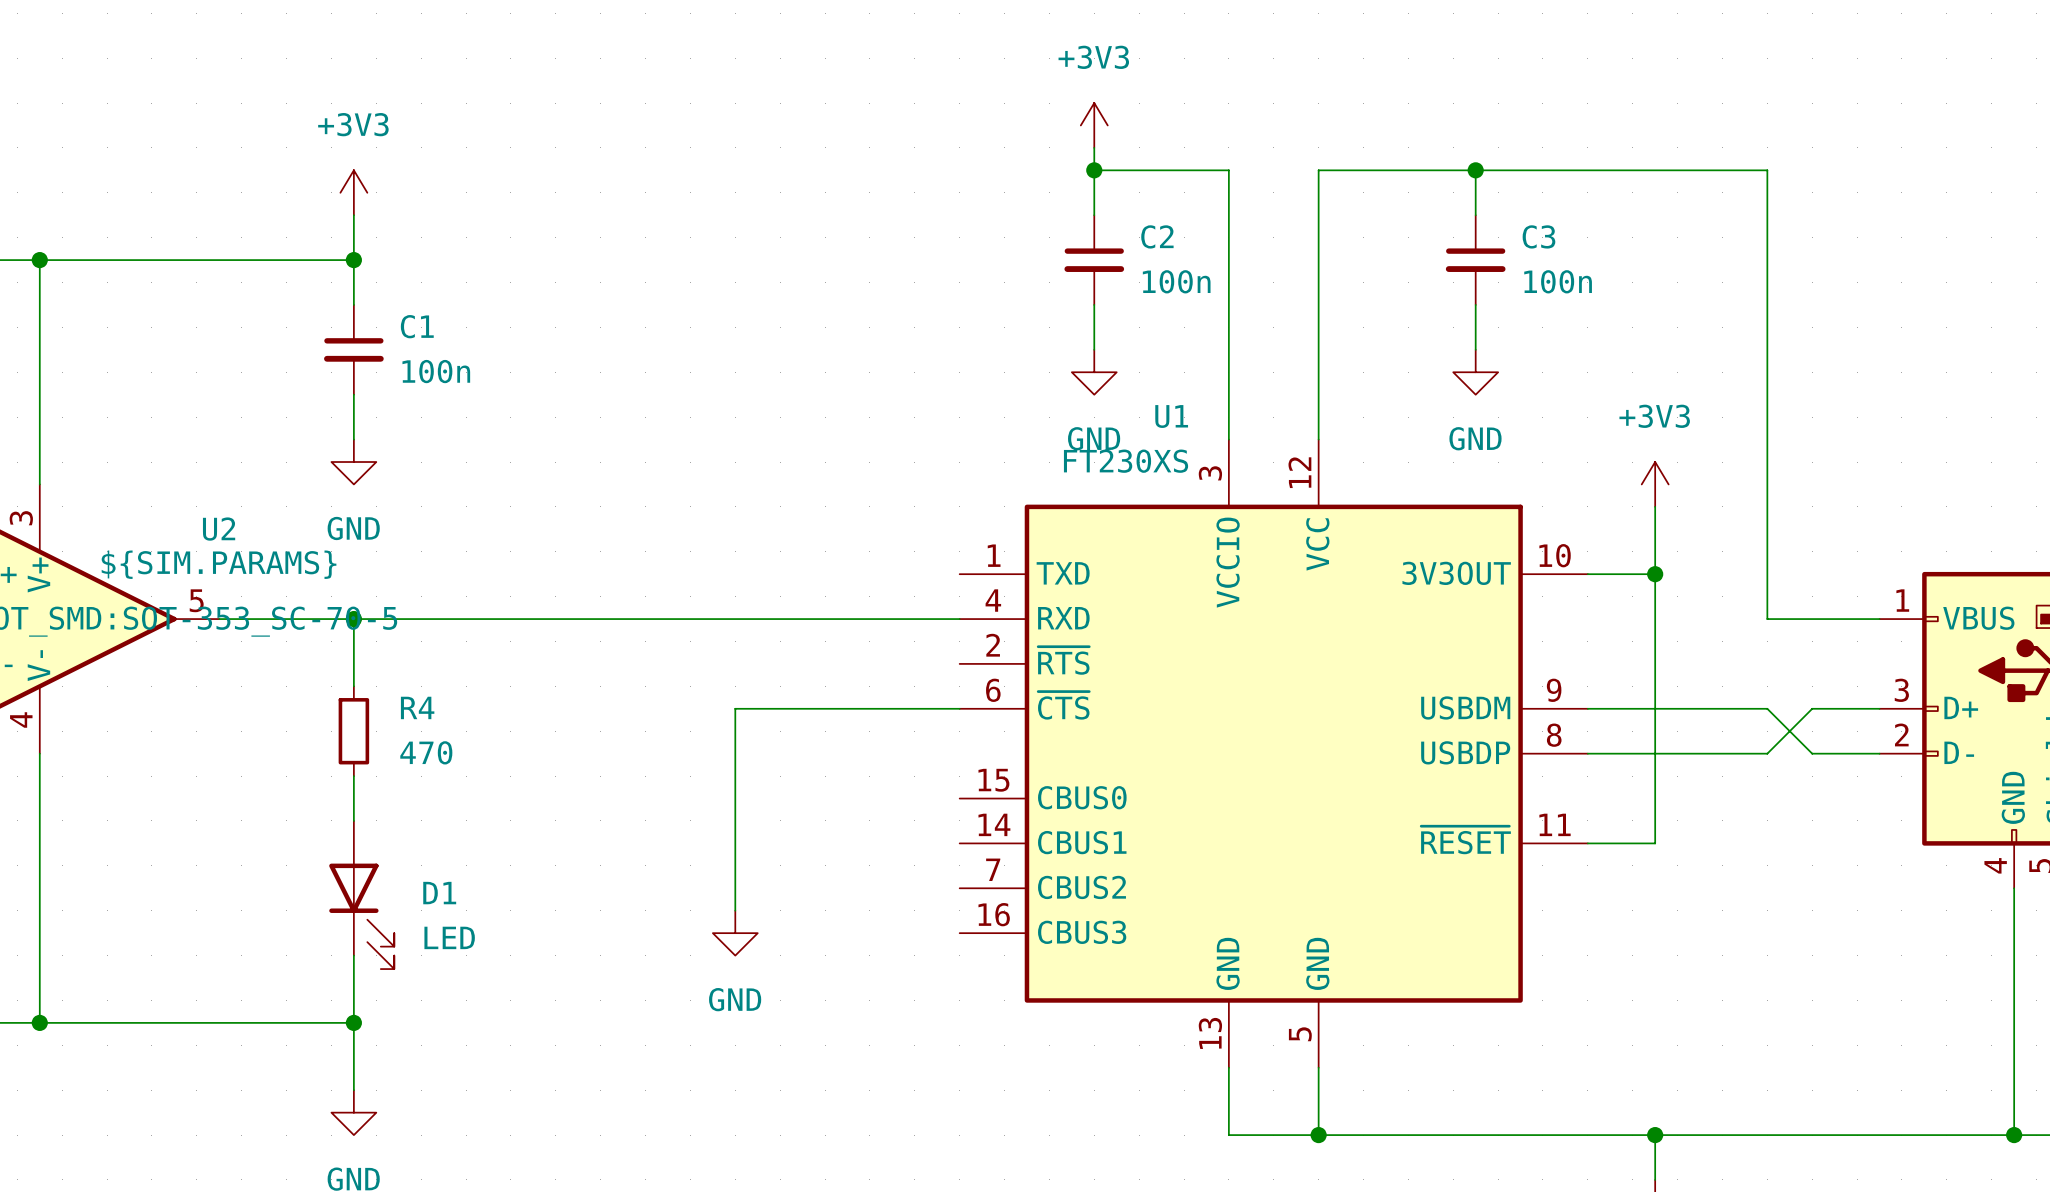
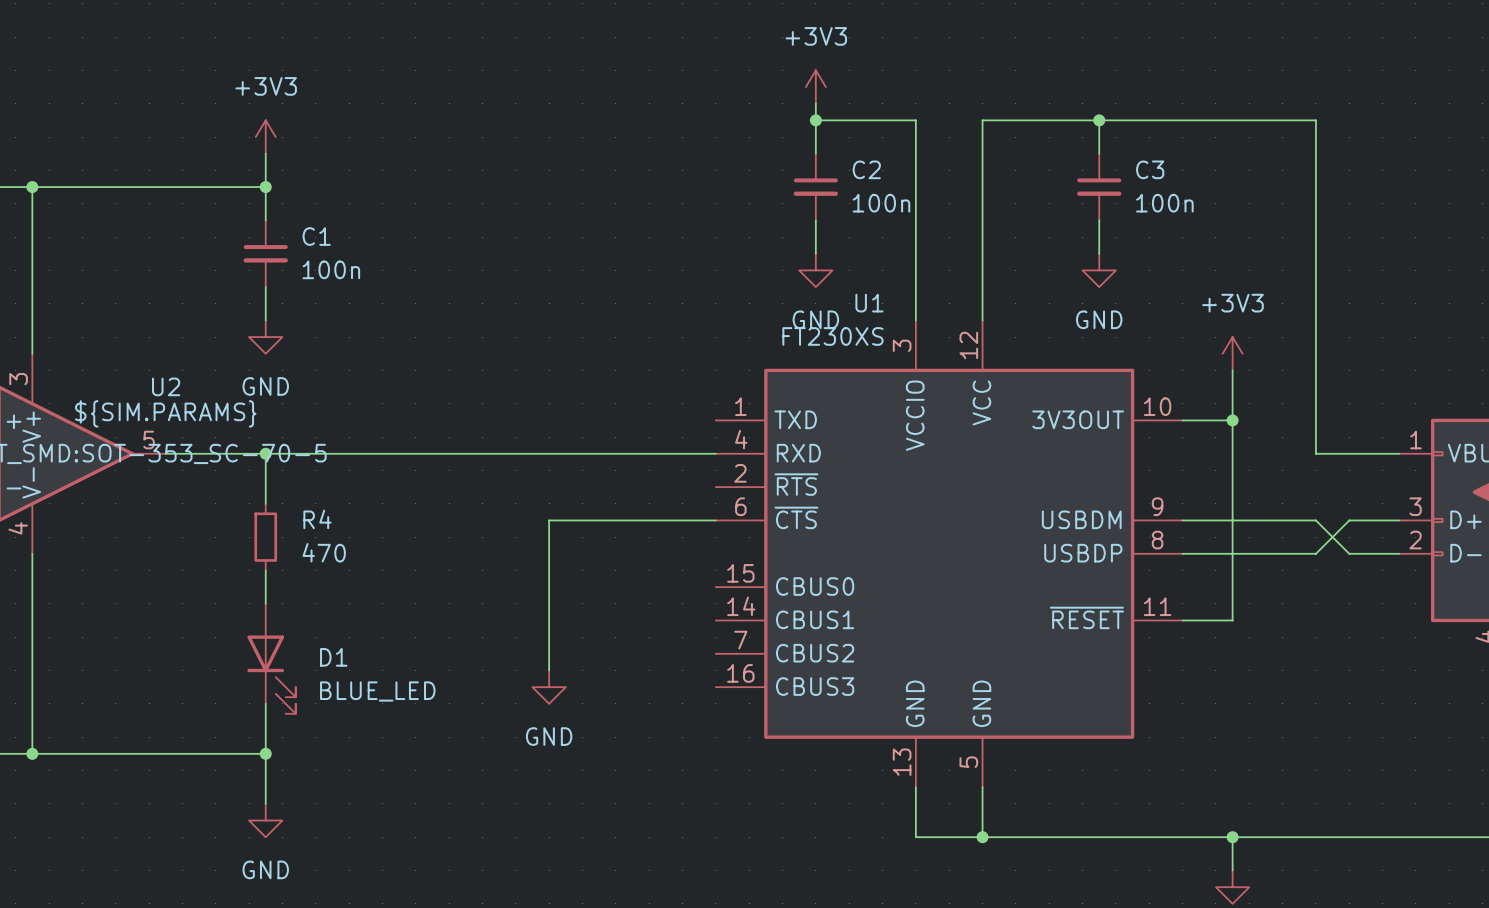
D1 value: LED (449, 937) -> BLUE_LED (377, 691)

